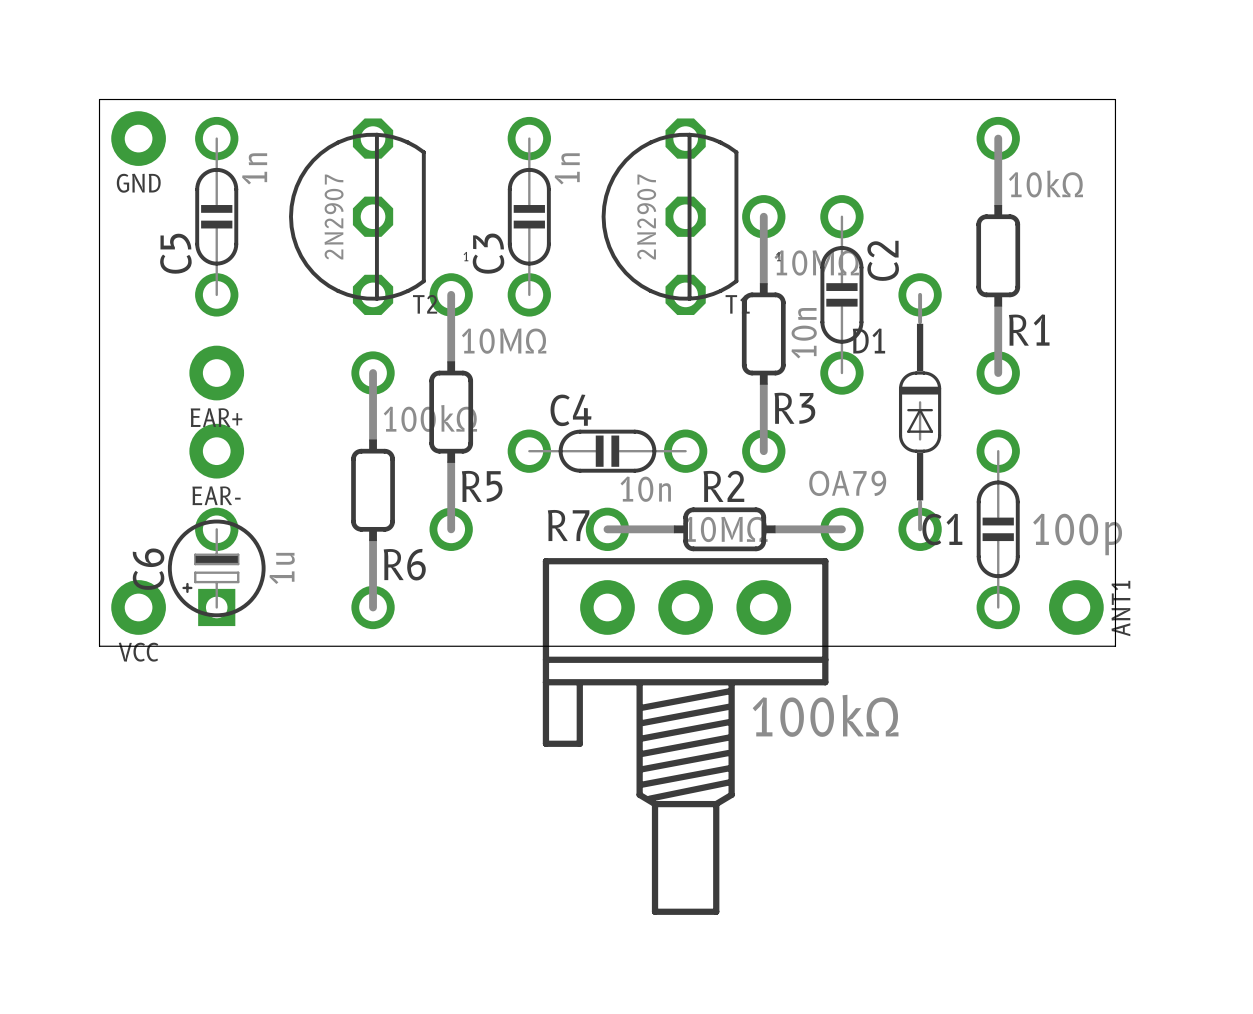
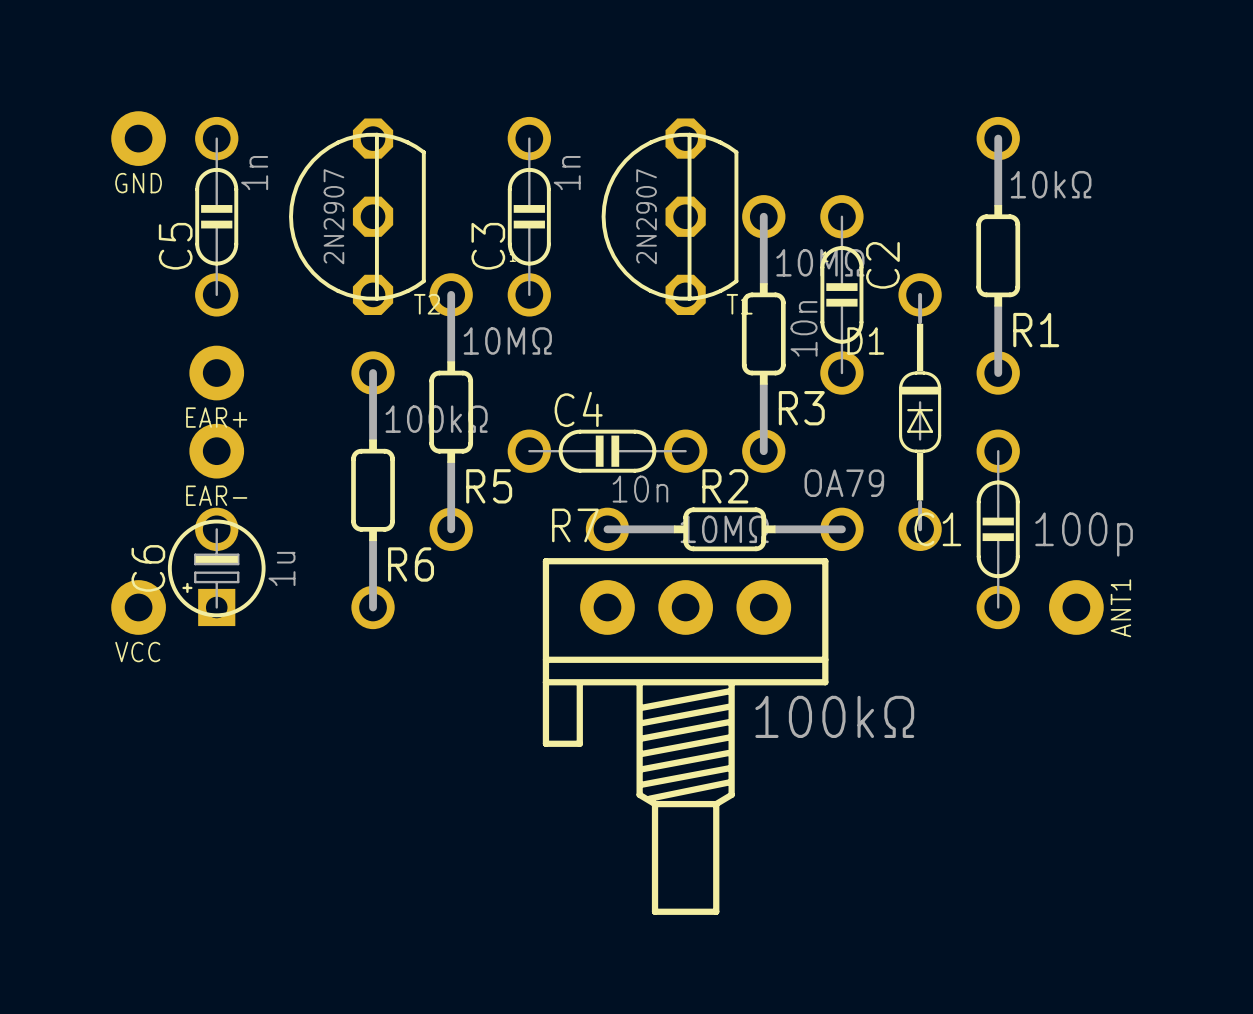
board edge: (99, 99) (1115, 99) (1115, 646) (99, 646) (99, 99) -> none

